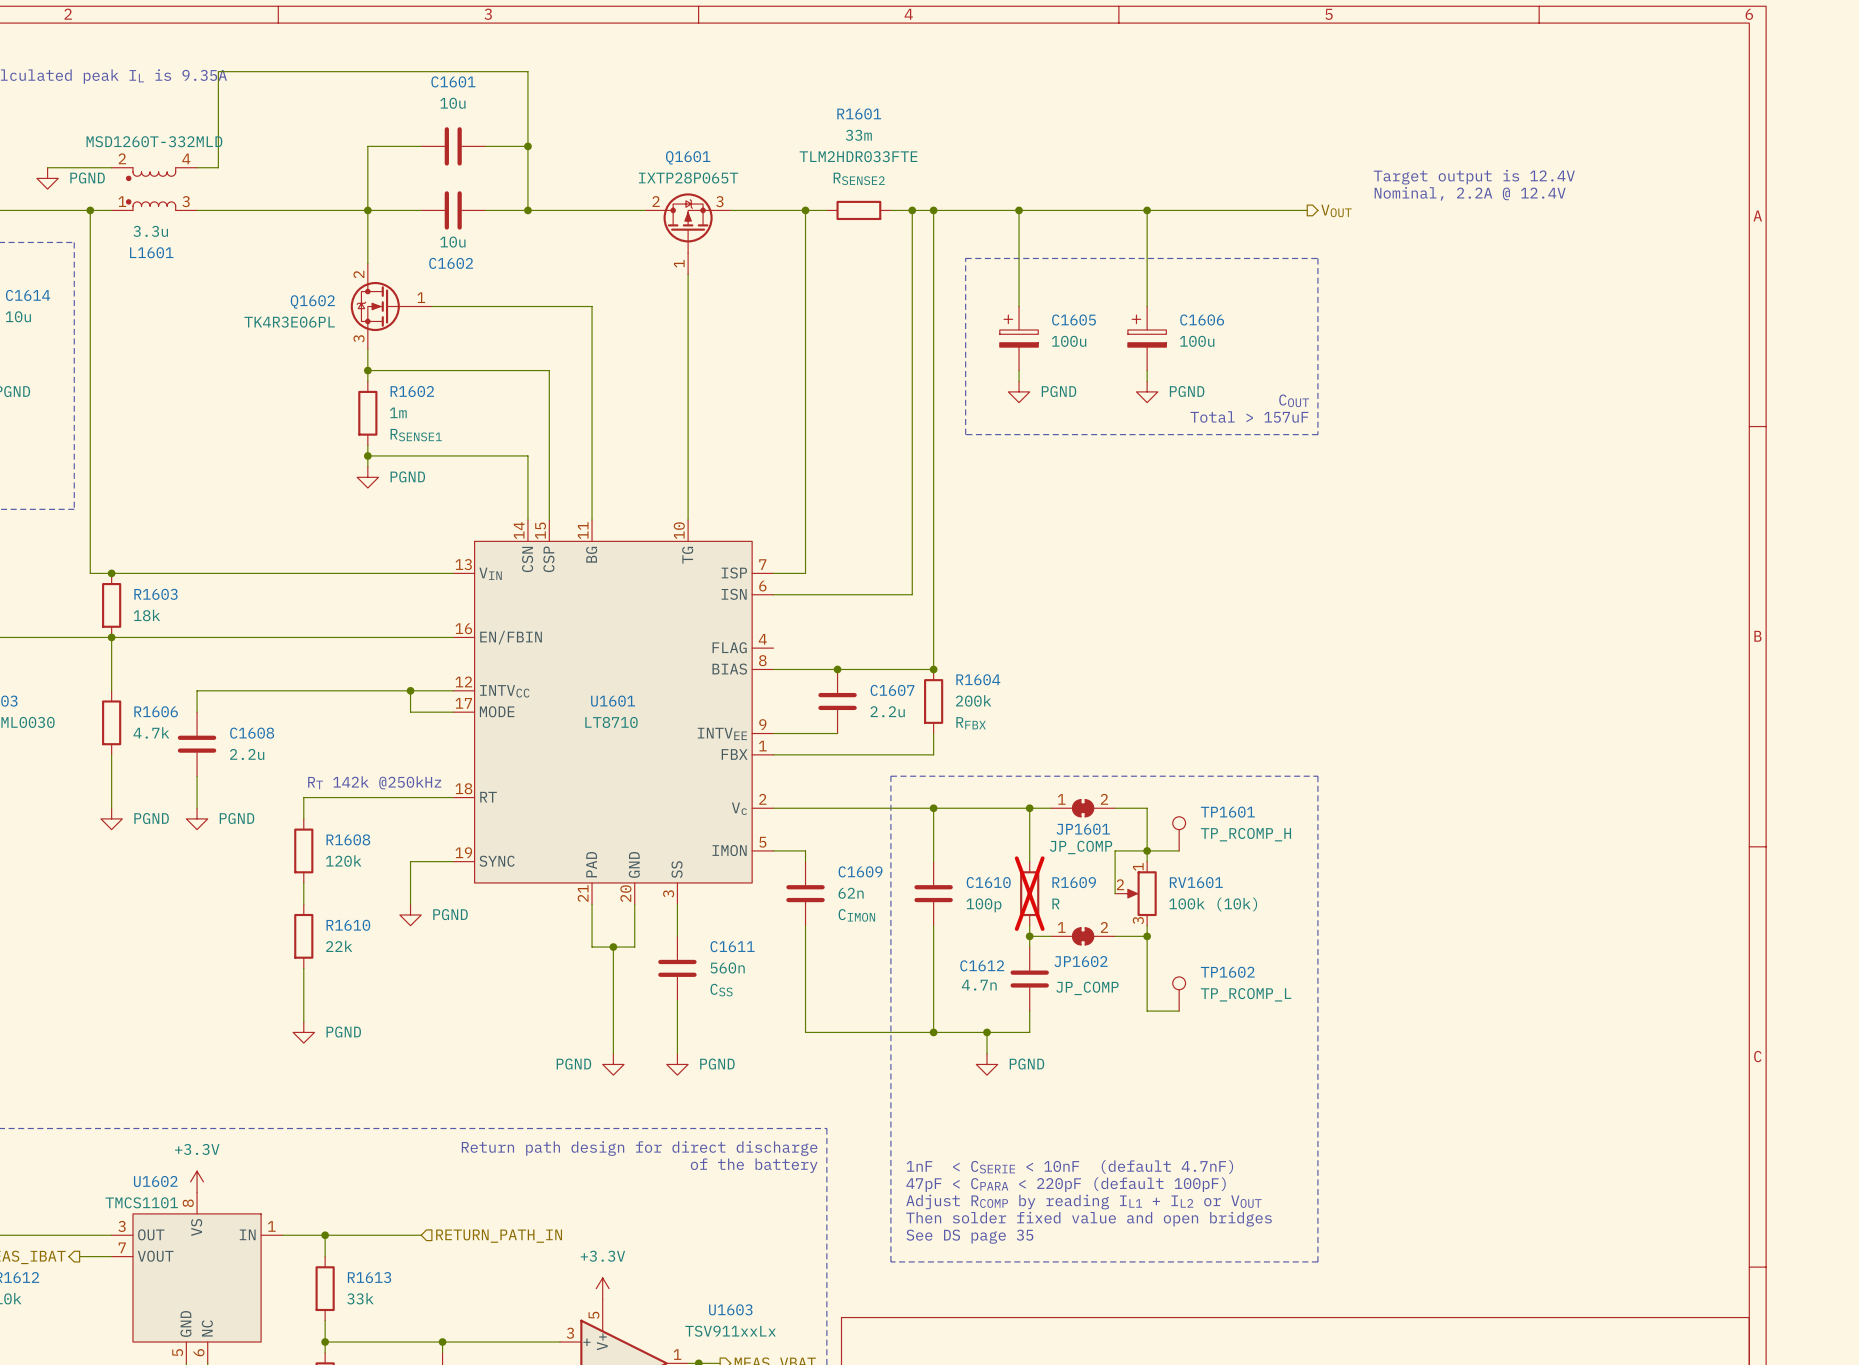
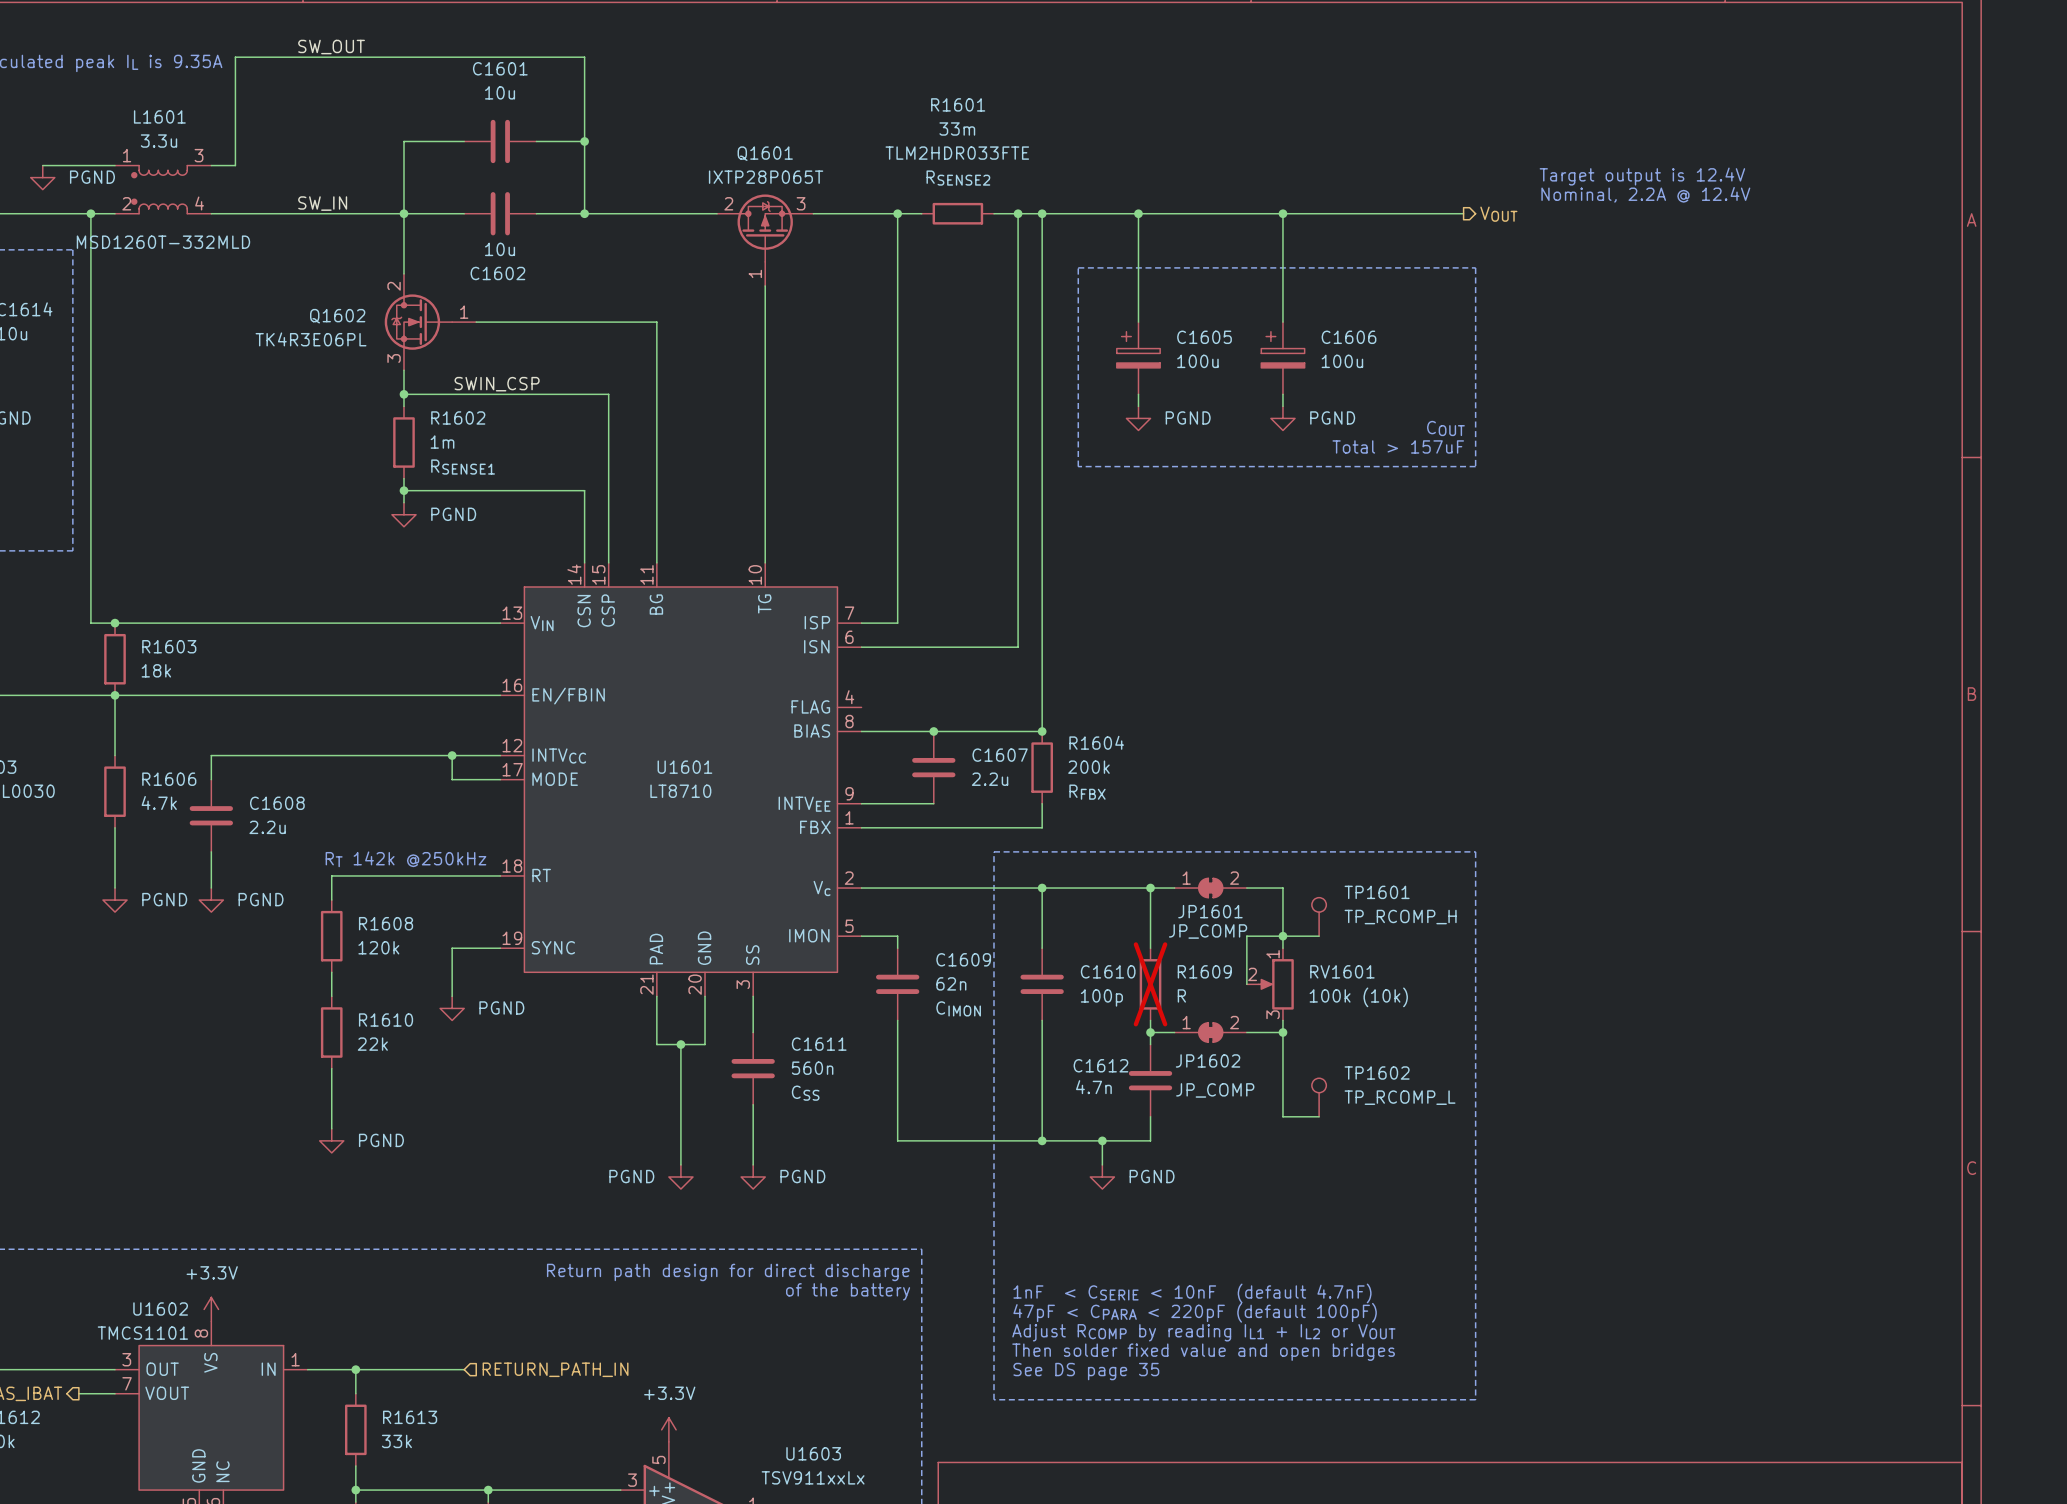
label: none -> SW_OUT (331, 47)
L1601 flip: as is (151, 189) -> up-down (159, 189)
label: none -> SW_IN (322, 203)
label: none -> SWIN_CSP (497, 384)

